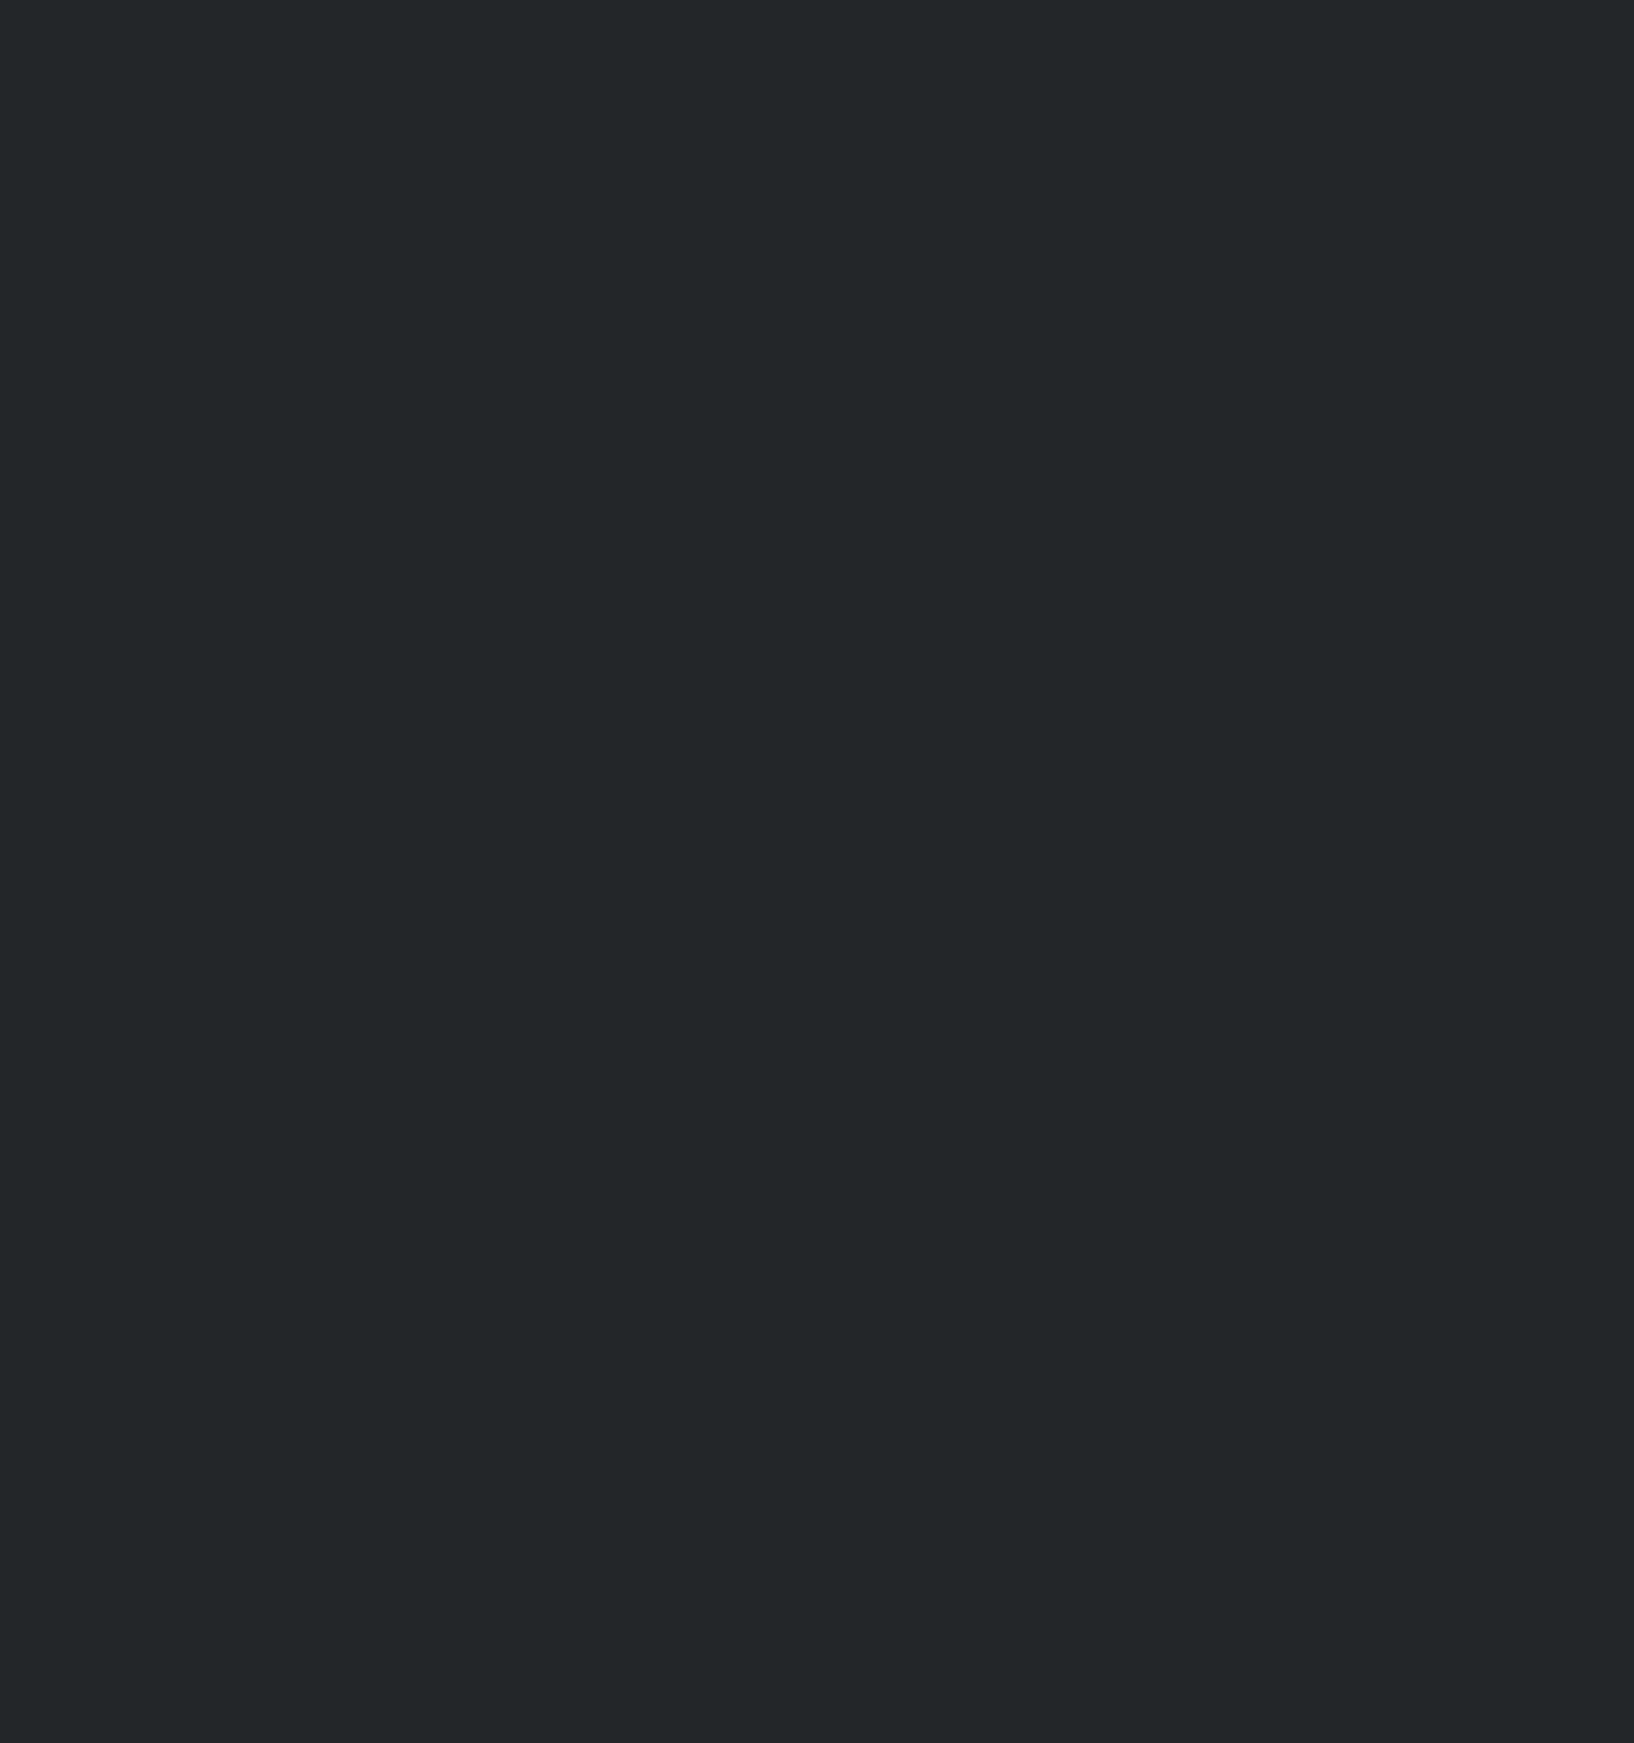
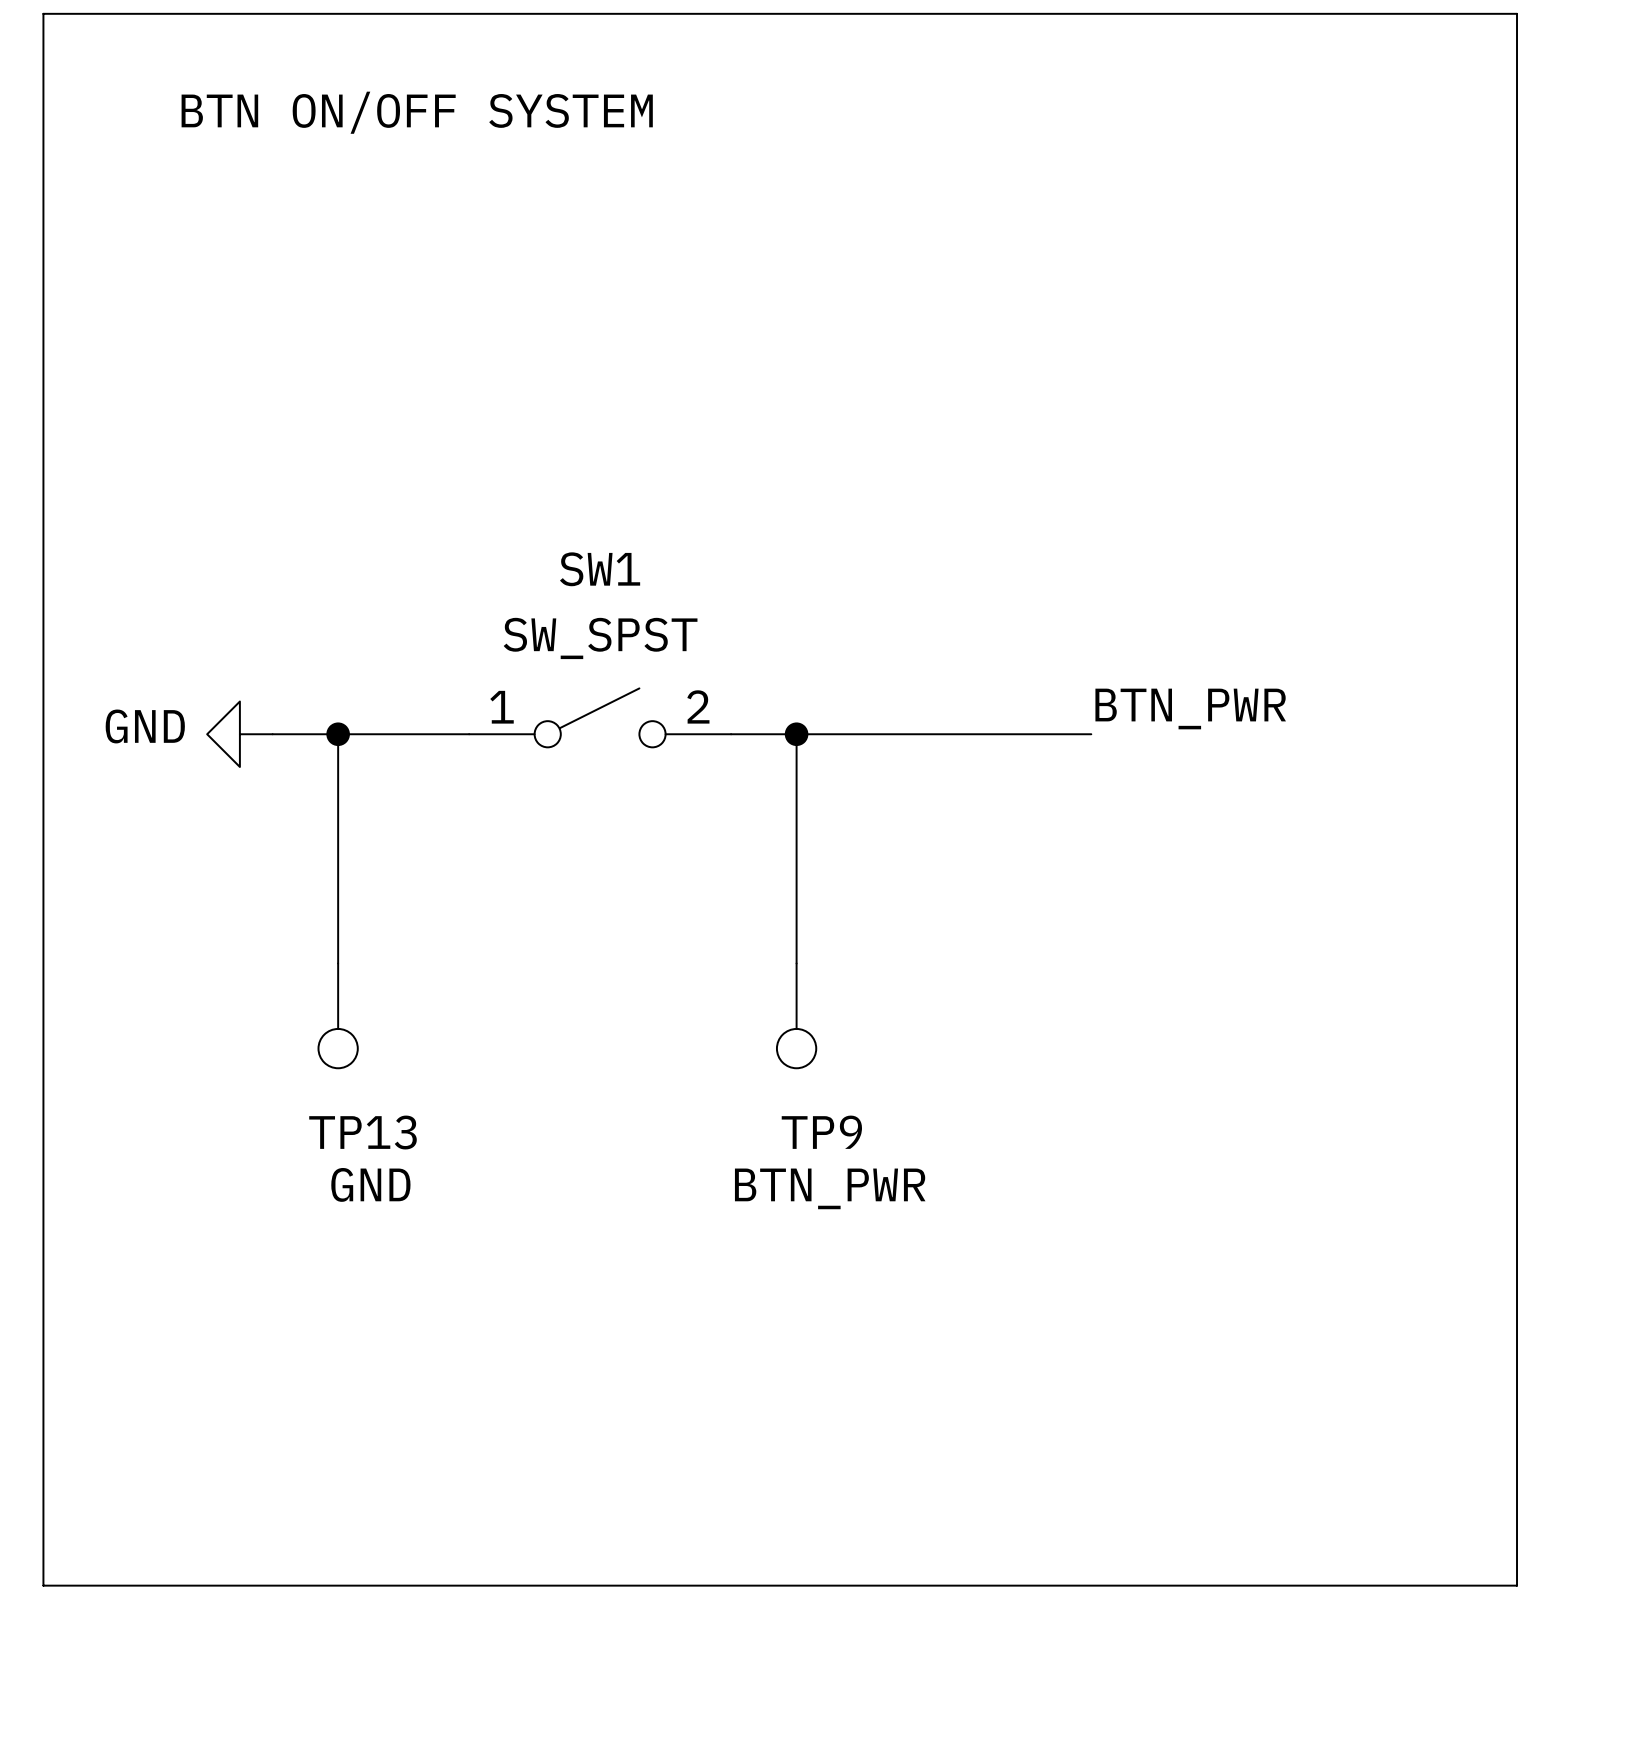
line: none -> (43, 13) (1517, 13) (1517, 1585) (43, 1585) (43, 13)
text: none -> BTN ON/OFF SYSTEM (417, 112)
label: none -> BTN_PWR (1190, 708)
SW1: none -> SW_SPST (600, 717)
power symbol: none -> GND (239, 734)
wire: none -> (272, 734) (469, 734)
wire: none -> (338, 734) (338, 963)
junction: none -> (338, 734)
wire: none -> (731, 734) (1091, 734)
wire: none -> (796, 734) (796, 963)
junction: none -> (796, 734)
TP13: none -> GND (338, 1015)
TP9: none -> BTN_PWR (796, 1015)

